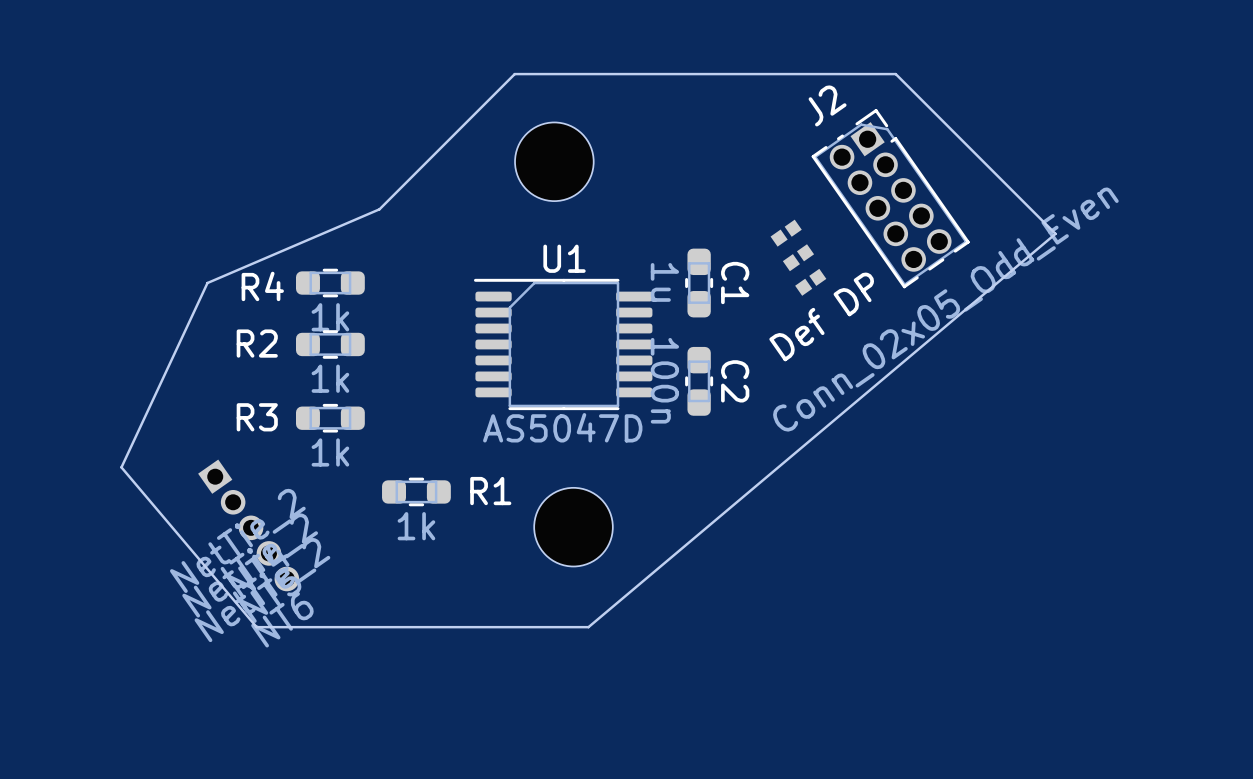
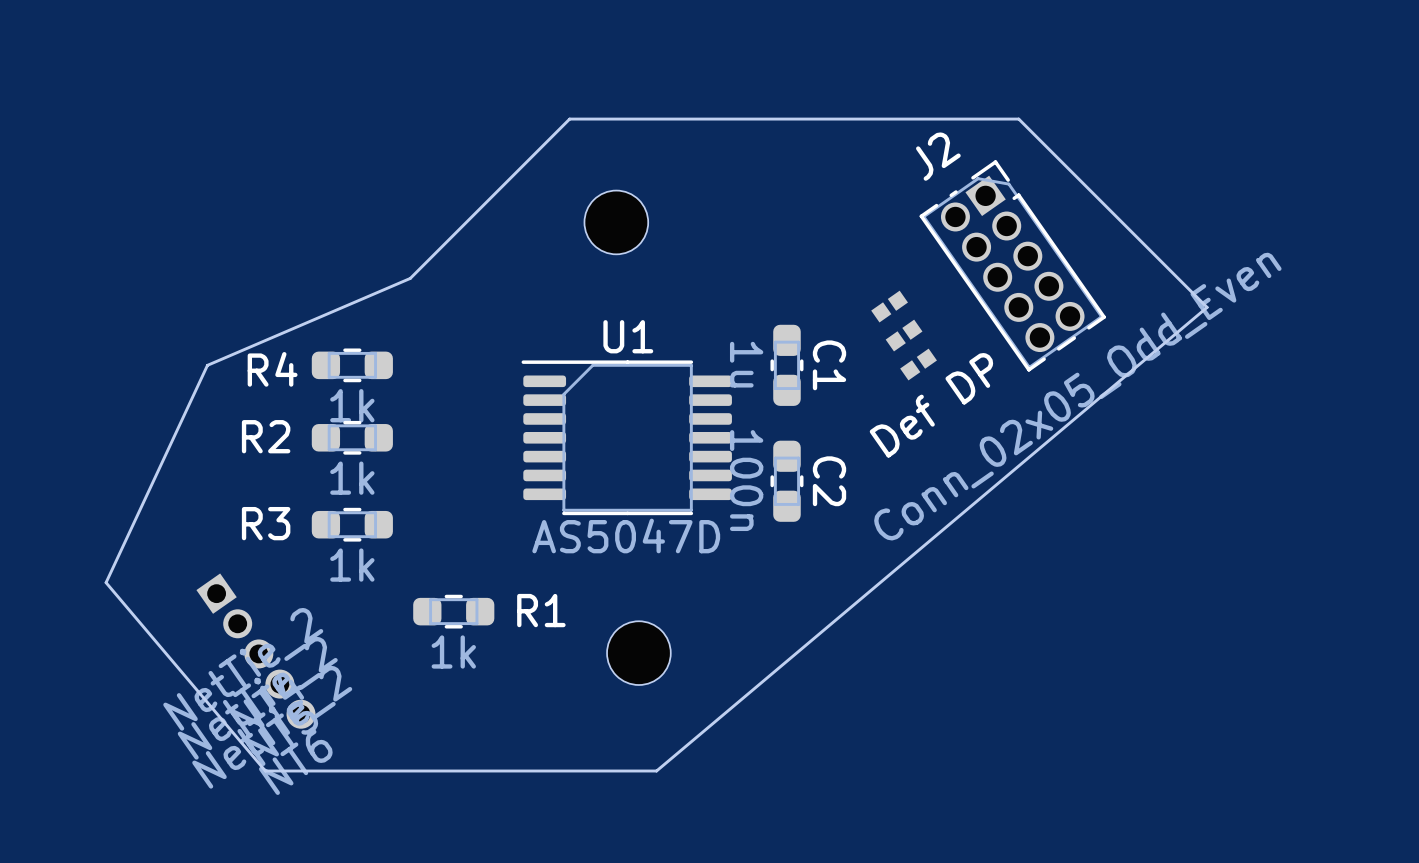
part footprint: [515, 122, 594, 202] -> [584, 190, 649, 255]
part footprint: [534, 487, 613, 567] -> [607, 621, 671, 686]

